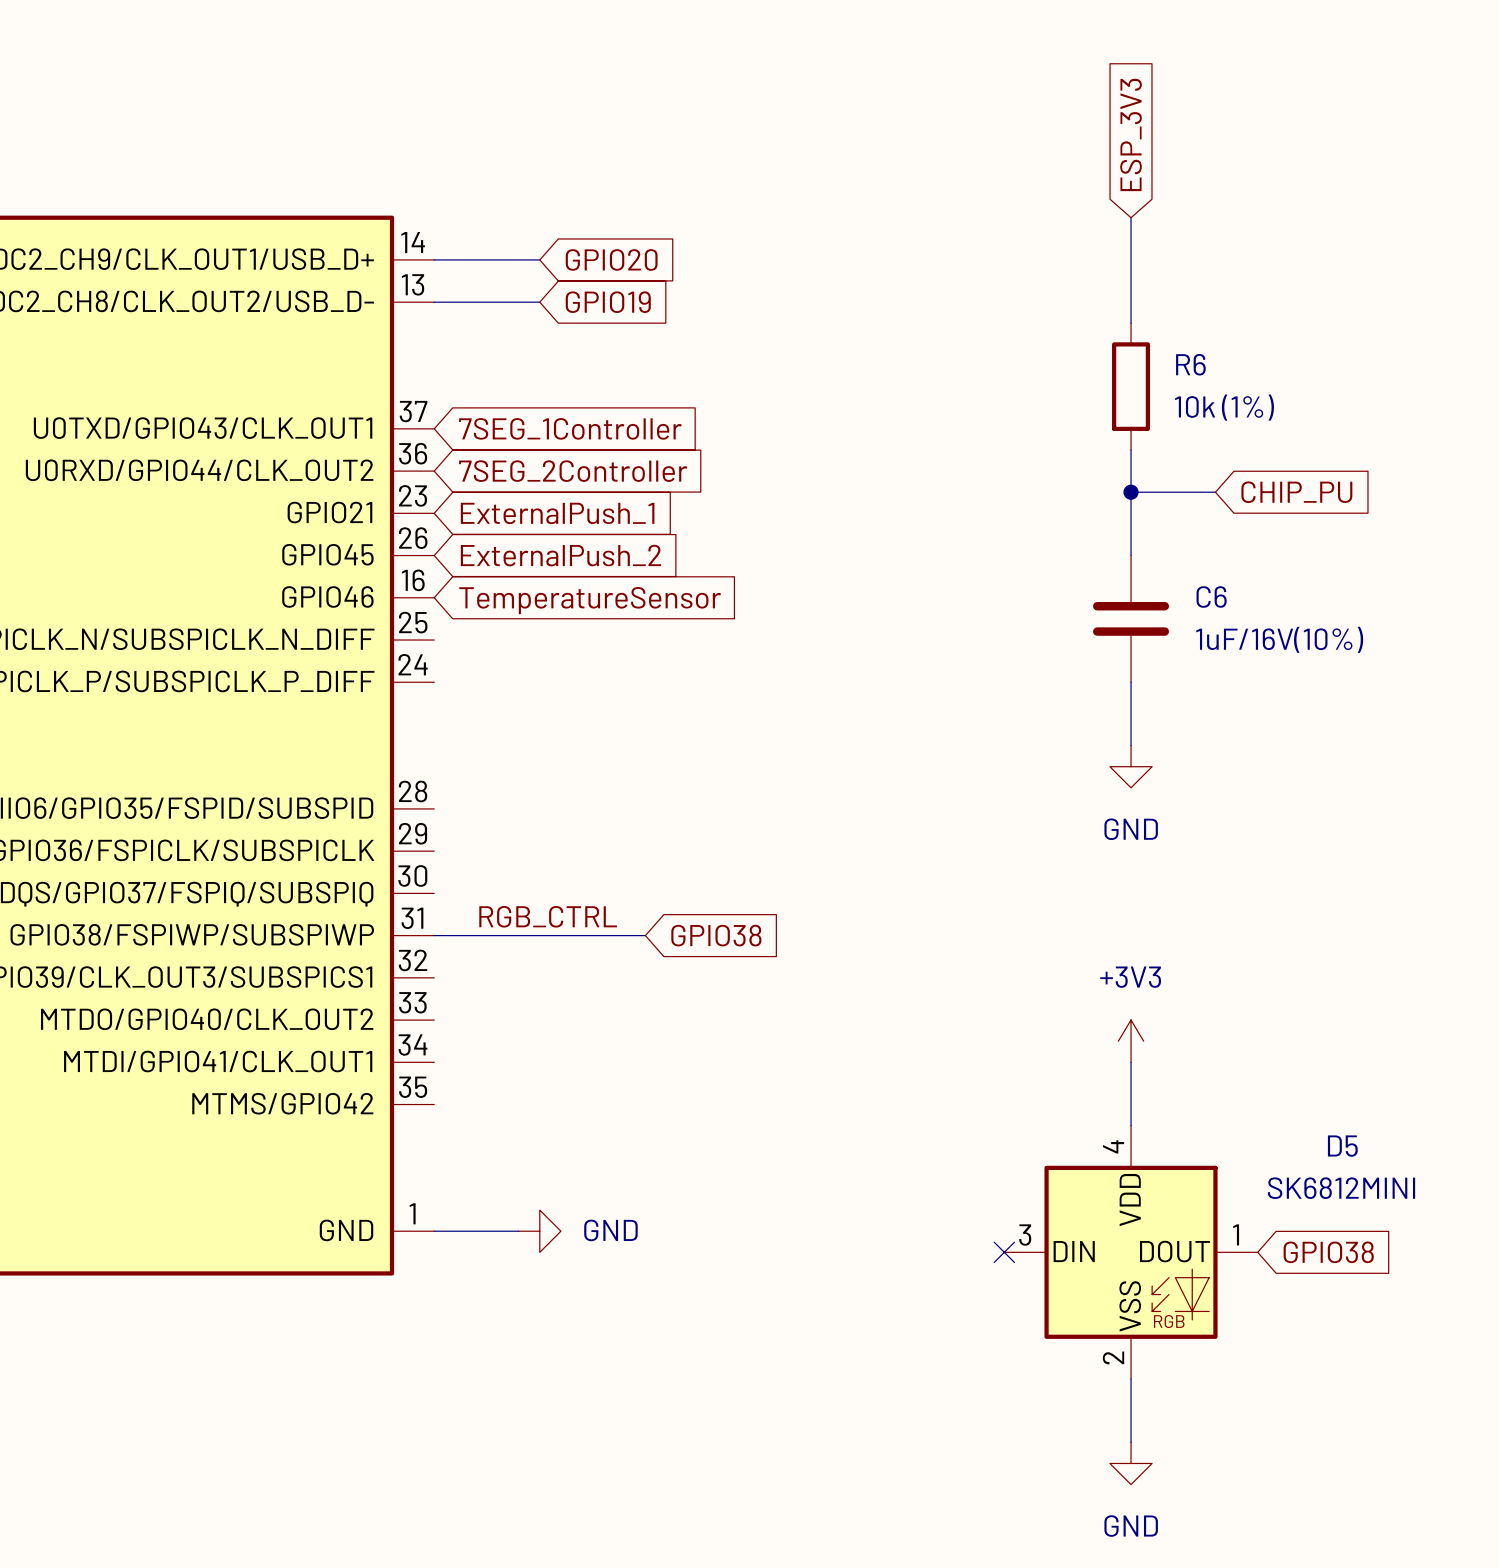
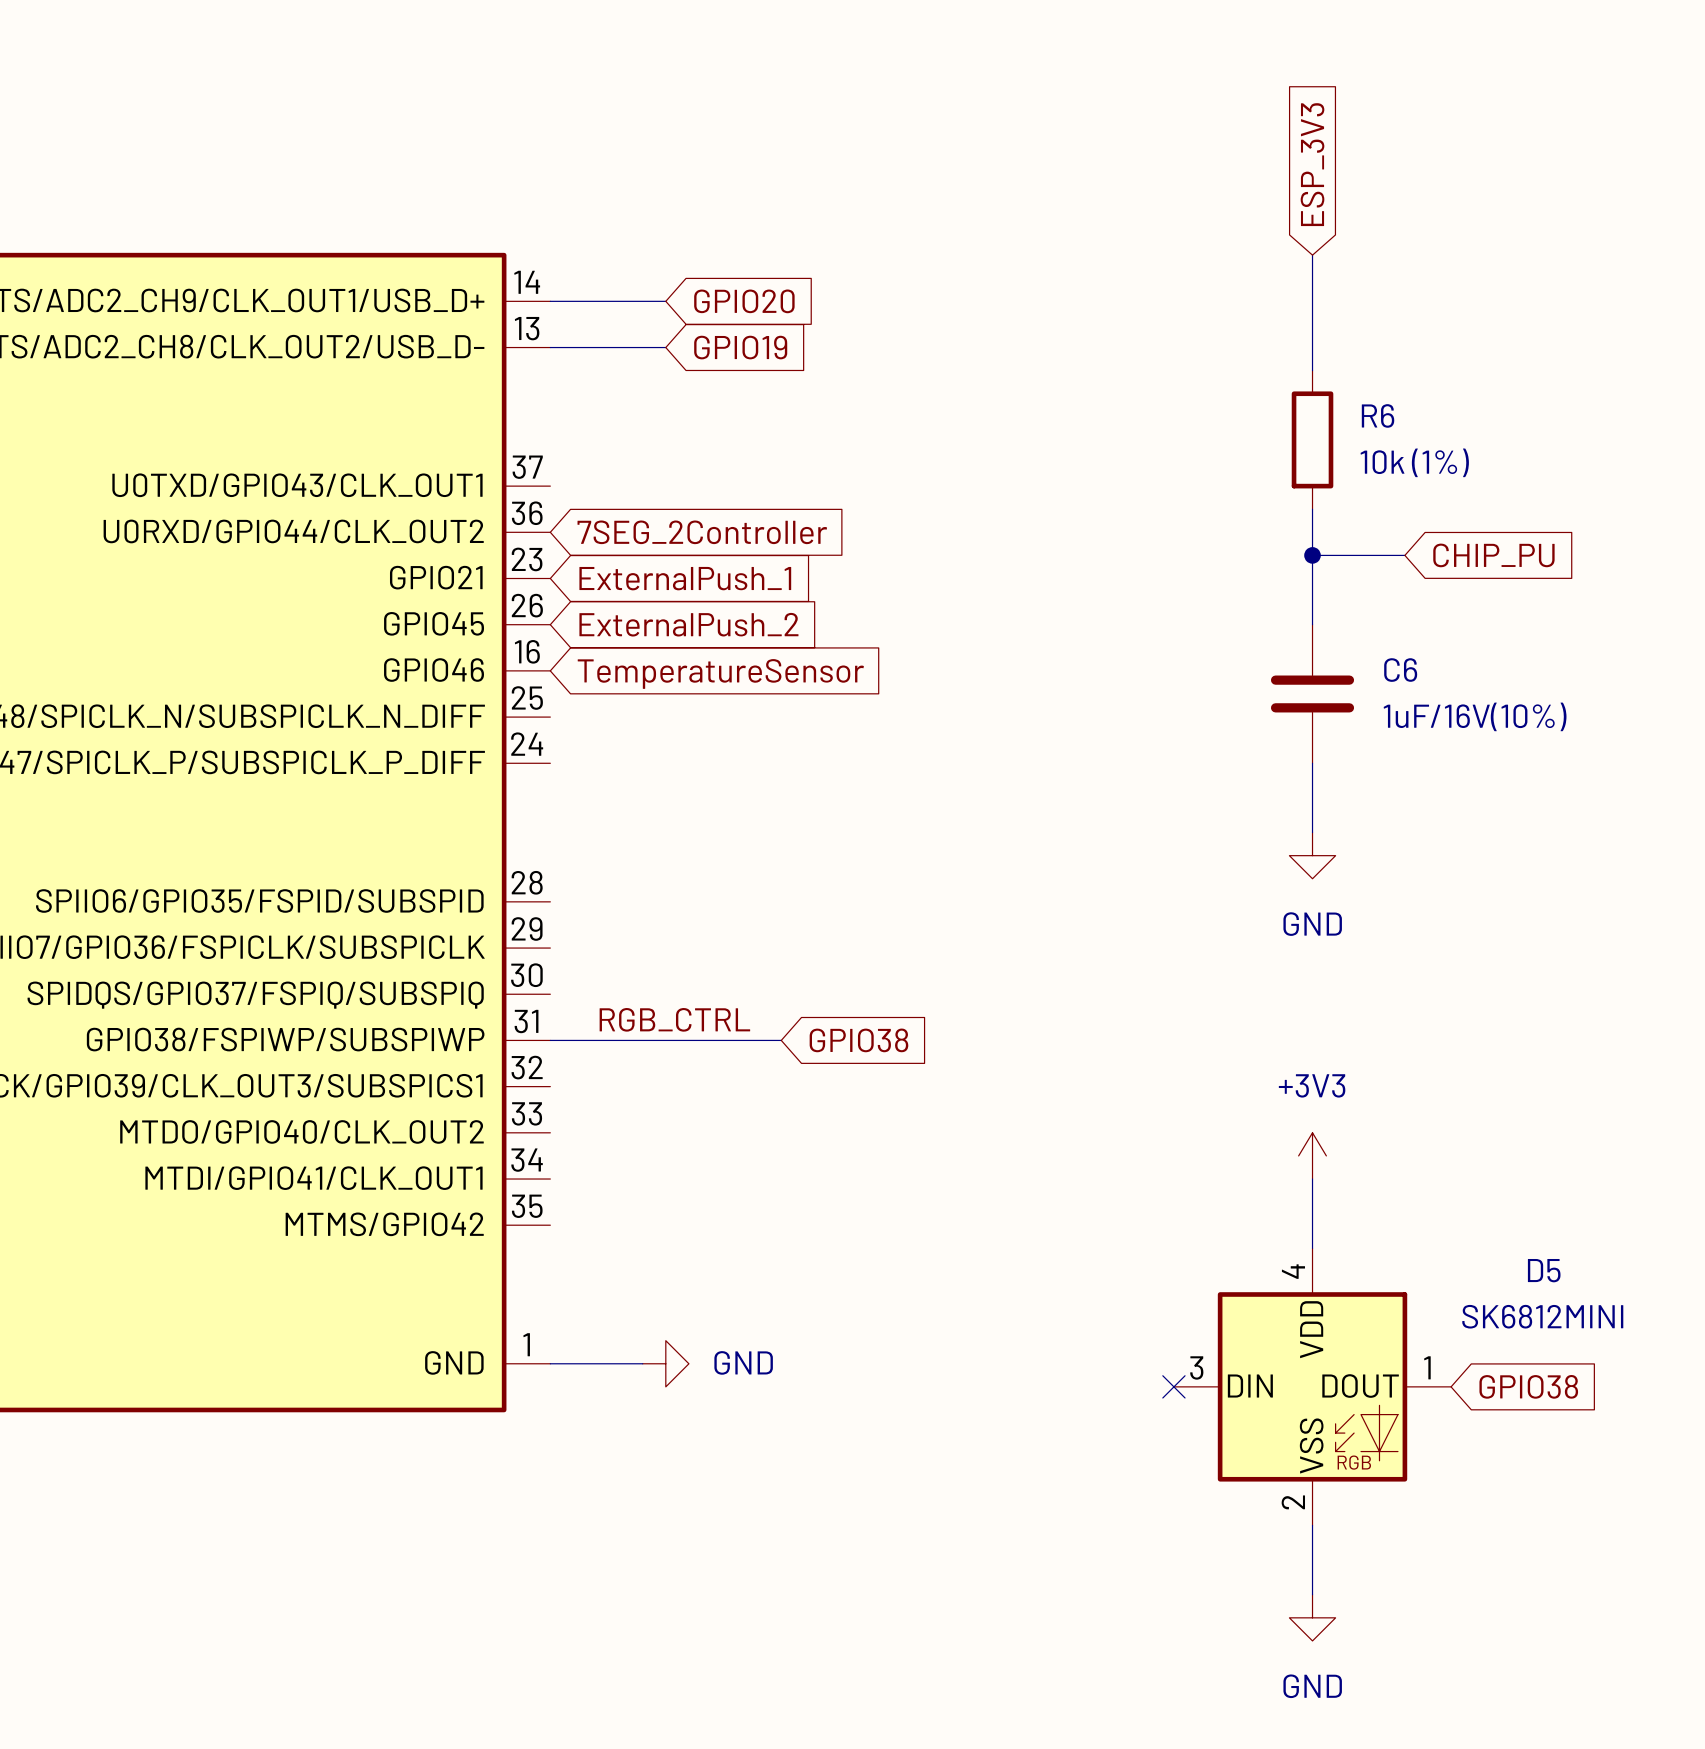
global label: 7SEG_1Controller (570, 428) -> none

